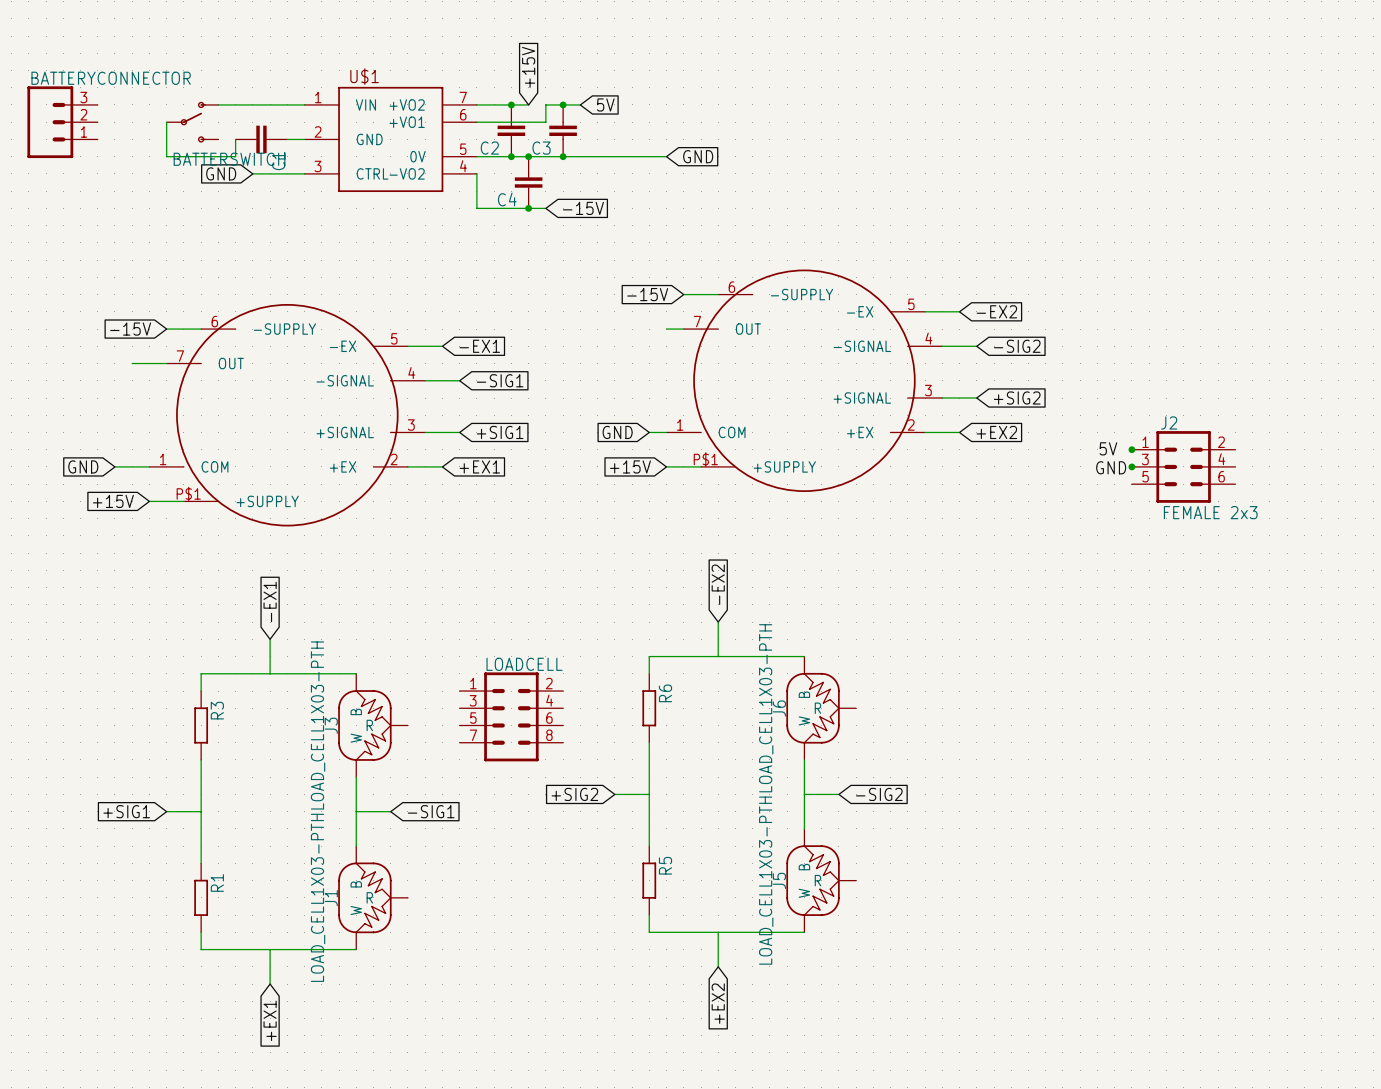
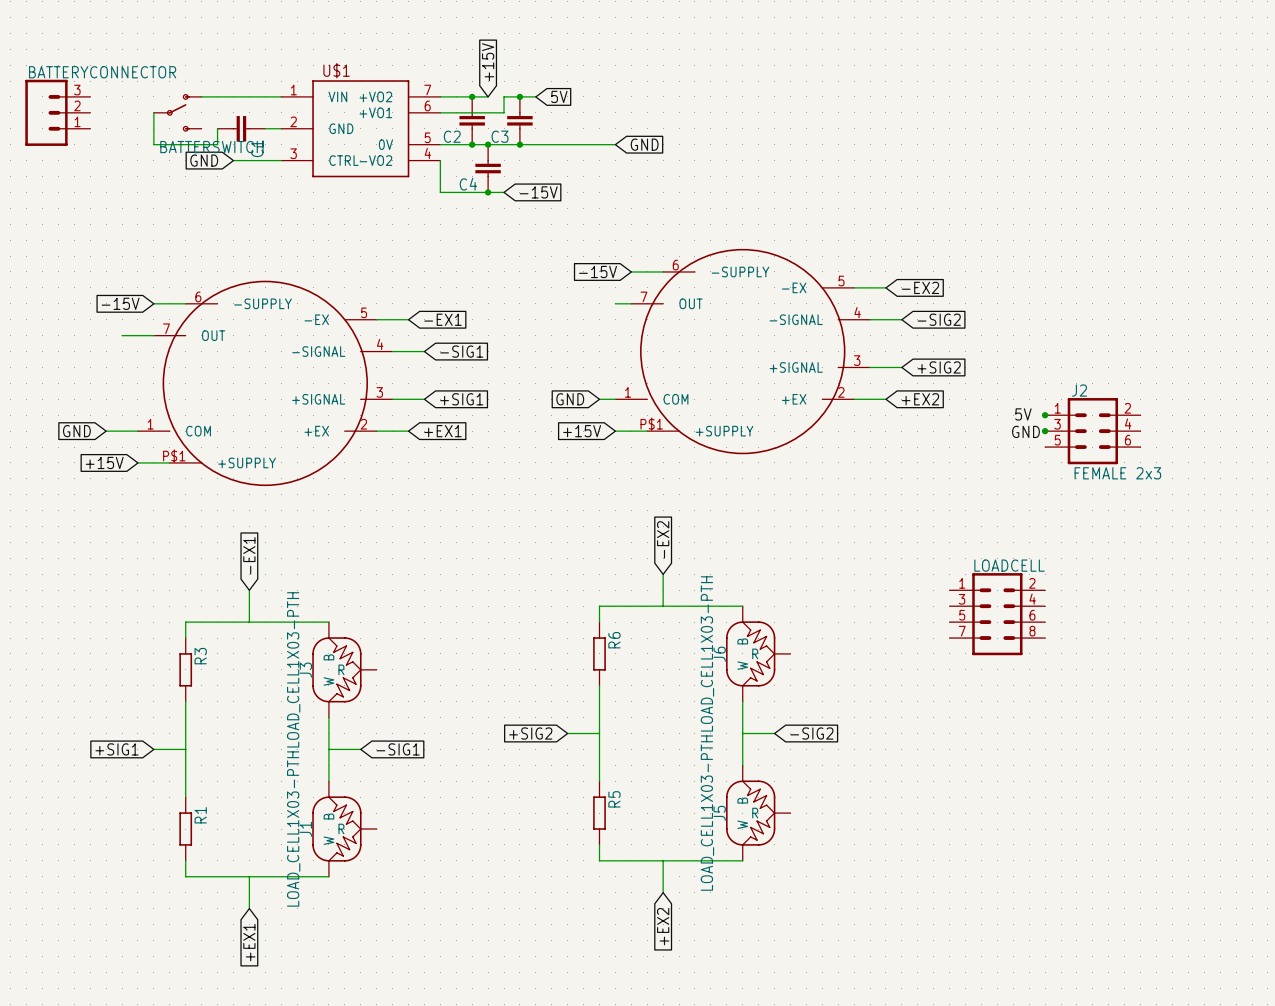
LOADCELL: none -> (997, 614)
LOADCELL: (511, 716) -> none

